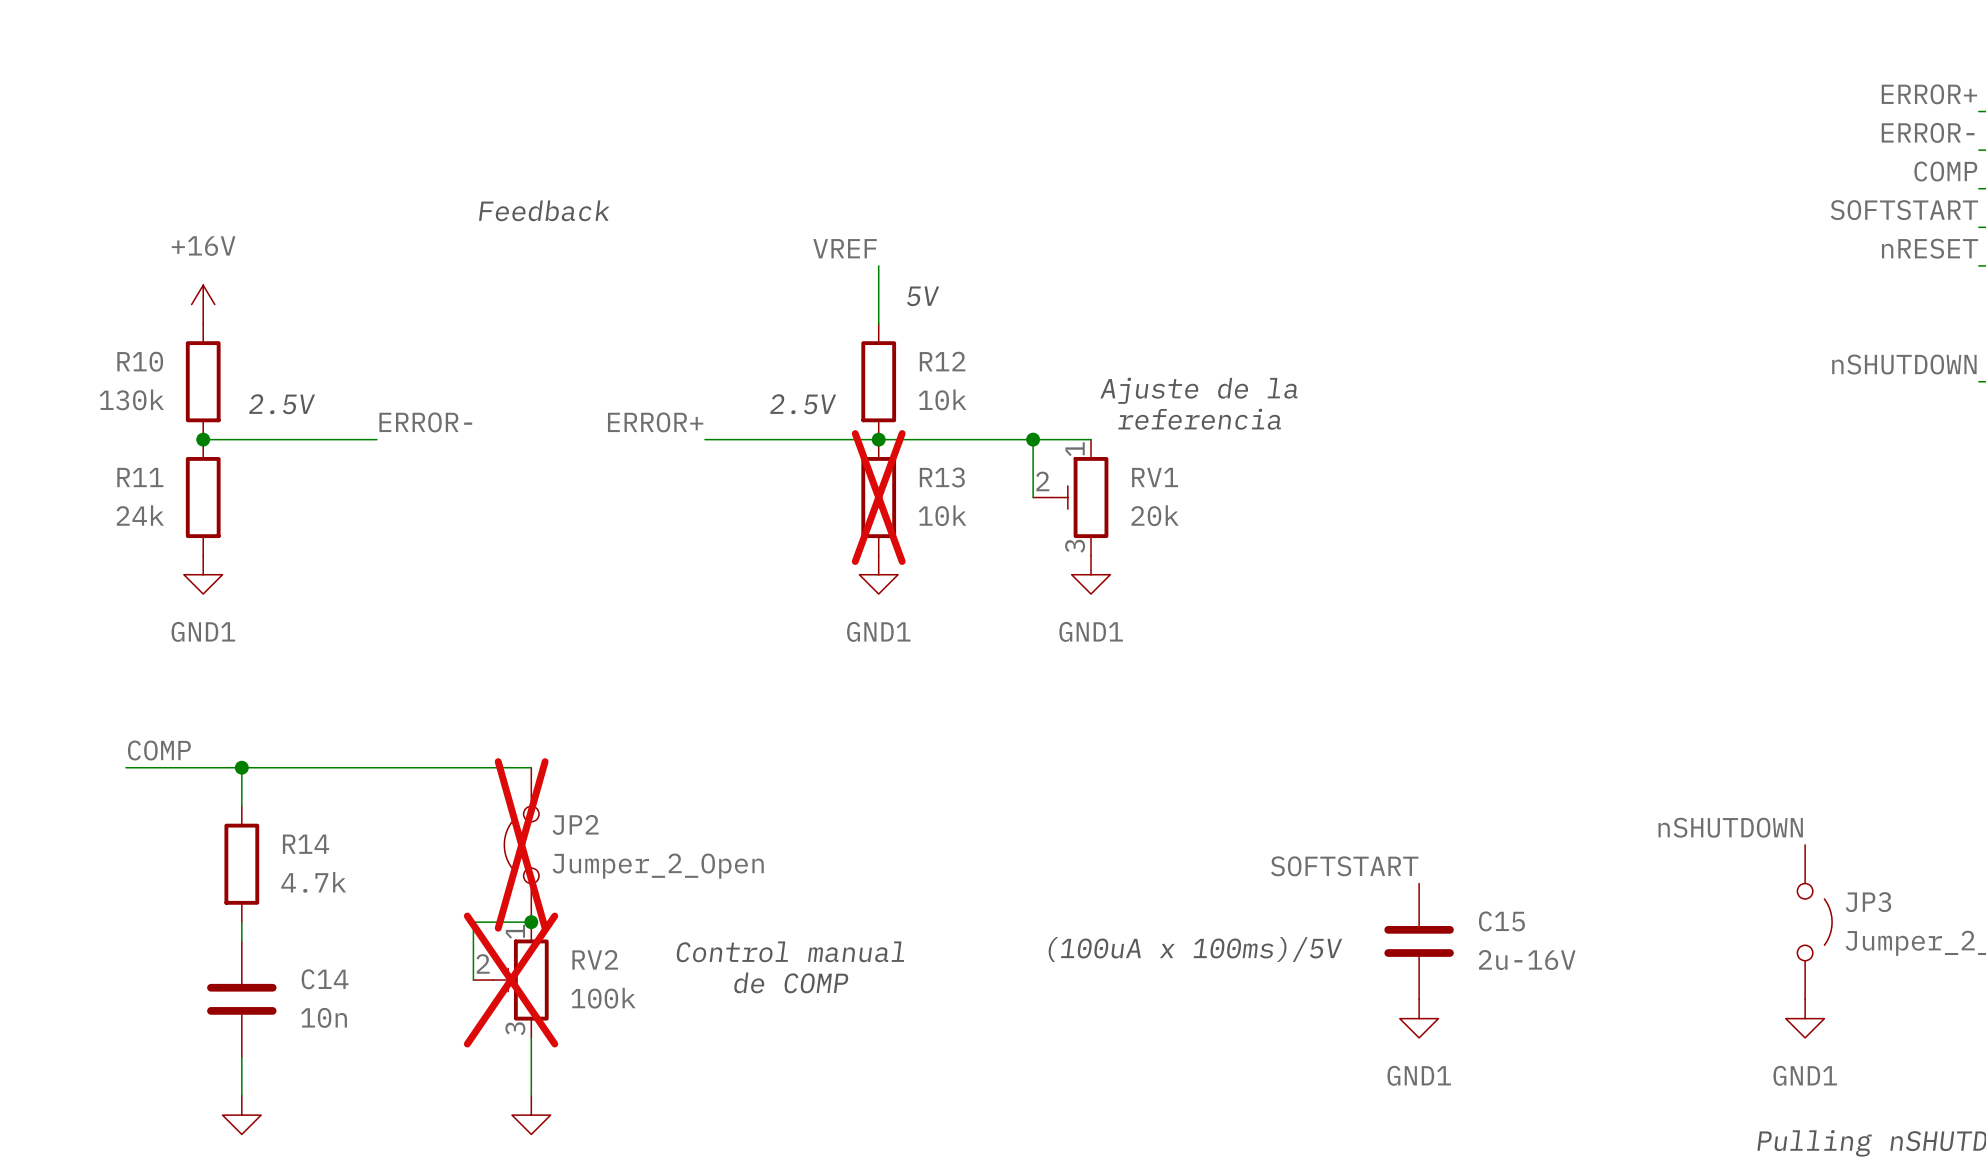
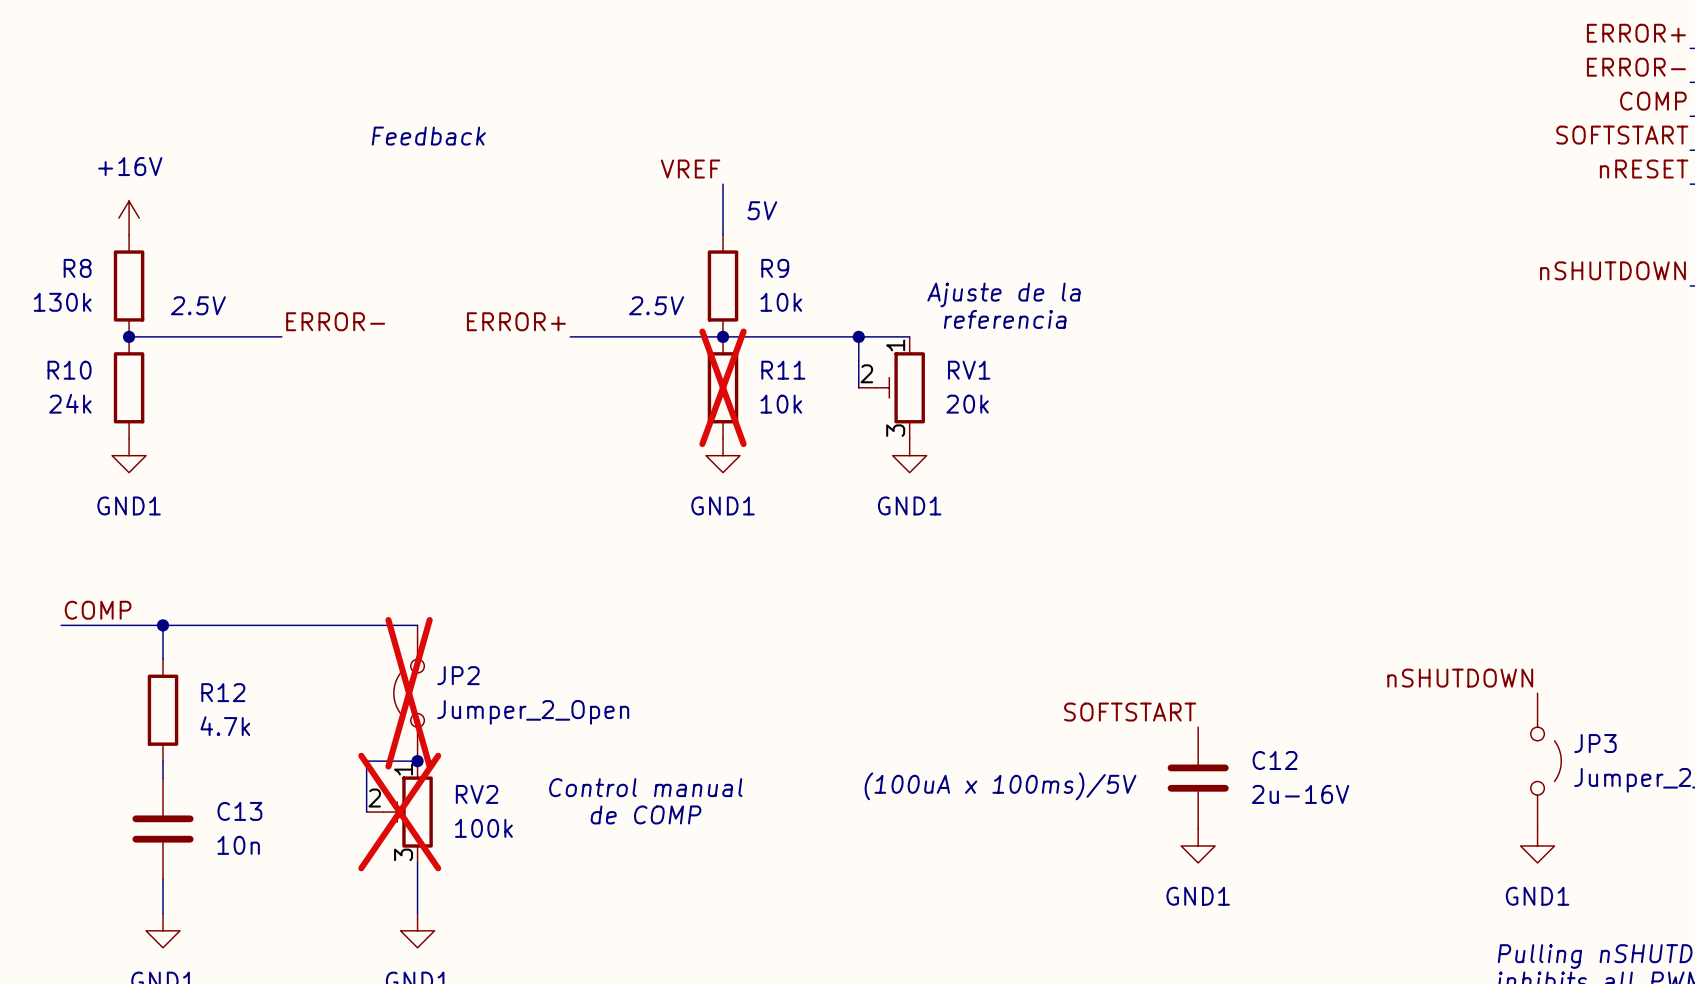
R10 name: R10 (140, 361) -> R8 (77, 268)
R12 name: R12 (942, 361) -> R9 (775, 268)
R11 name: R11 (140, 477) -> R10 (69, 370)
R13 name: R13 (942, 477) -> R11 (783, 370)
R14 name: R14 (306, 844) -> R12 (223, 692)
C15 name: C15 (1501, 921) -> C12 (1275, 760)
C14 name: C14 (325, 979) -> C13 (239, 811)

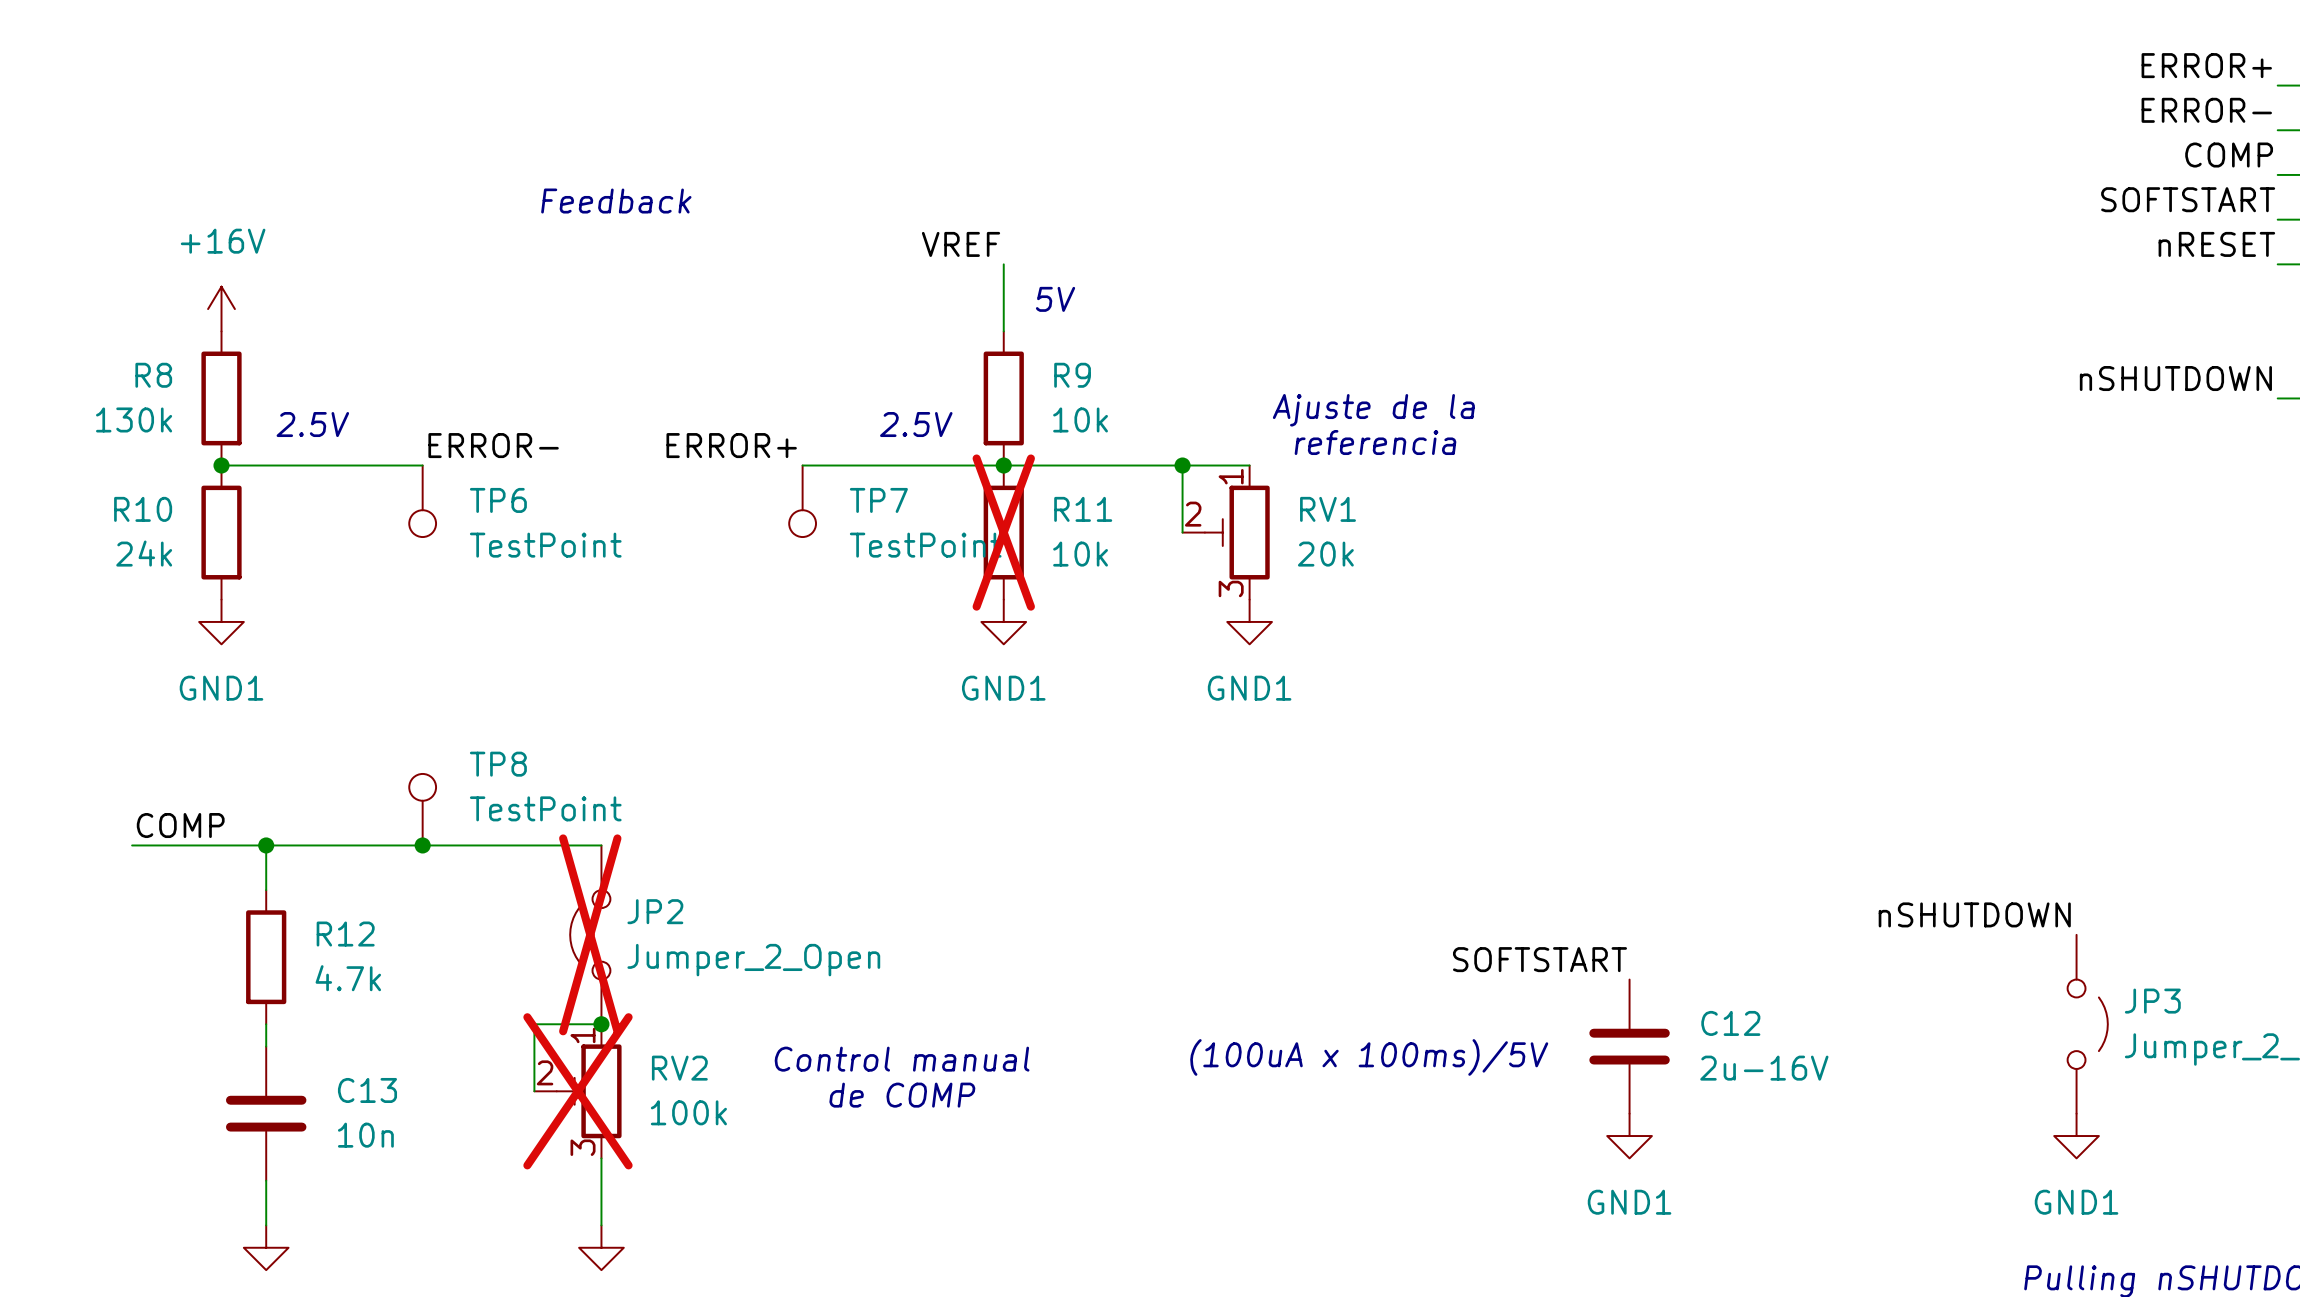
TP6: none -> TestPoint (422, 501)
TP7: none -> TestPoint (802, 501)
TP8: none -> TestPoint (422, 809)
junction: none -> (422, 845)

